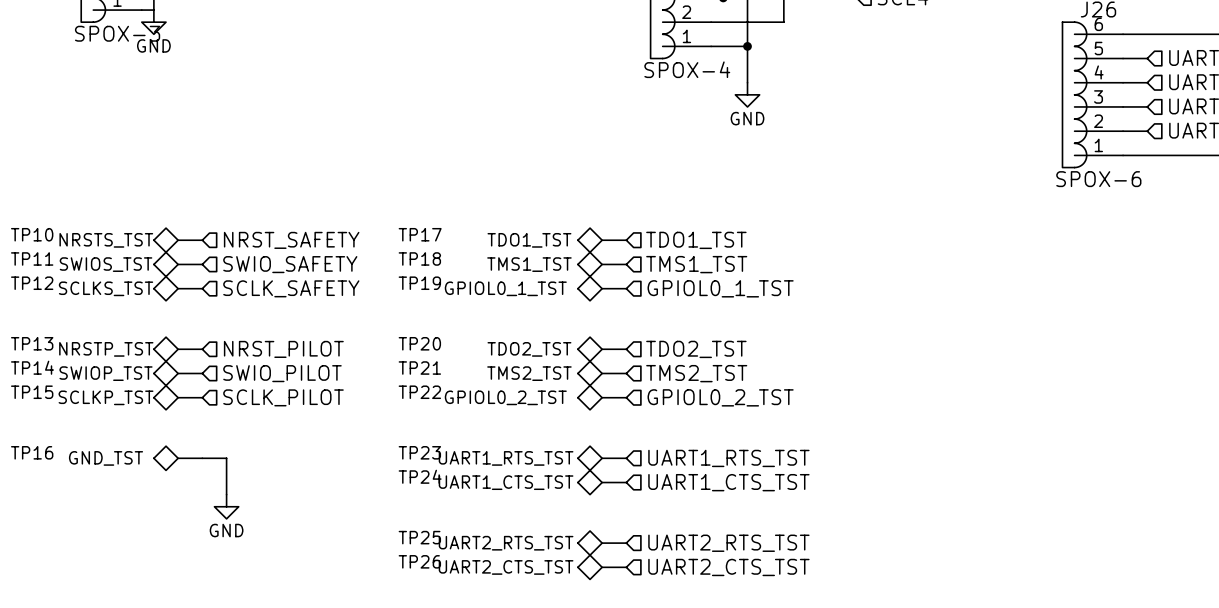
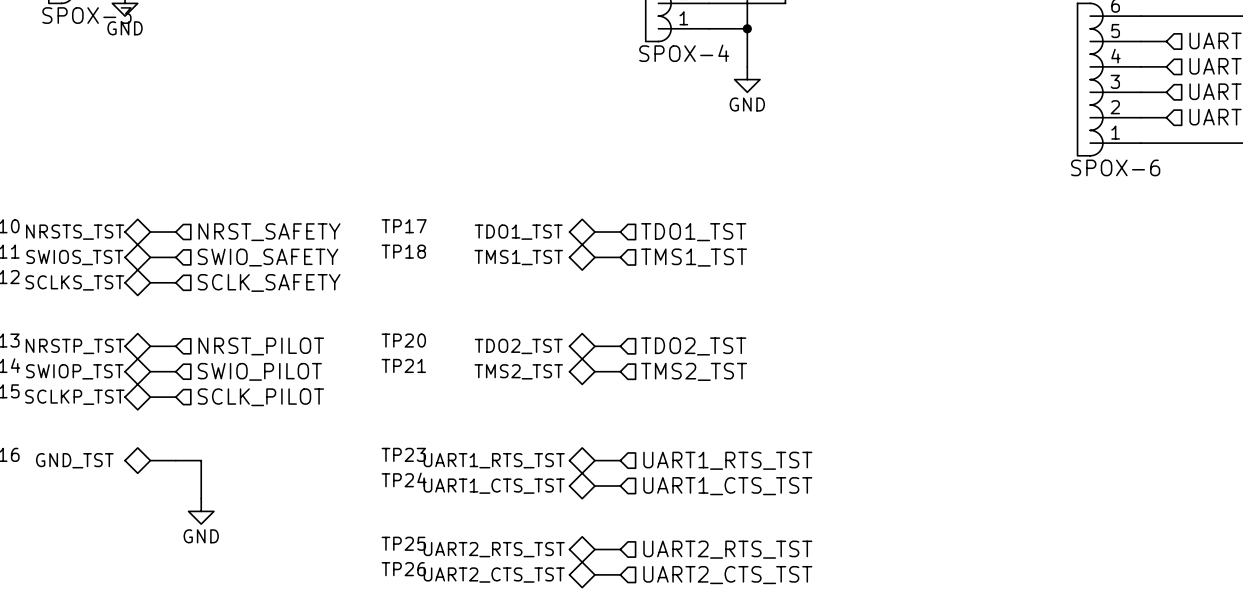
TP19: GPIOL0_1_TST (602, 288) -> none
hierarchical label: GPIOL0_1_TST (720, 288) -> none
TP22: GPIOL0_2_TST (602, 397) -> none
hierarchical label: GPIOL0_2_TST (720, 397) -> none

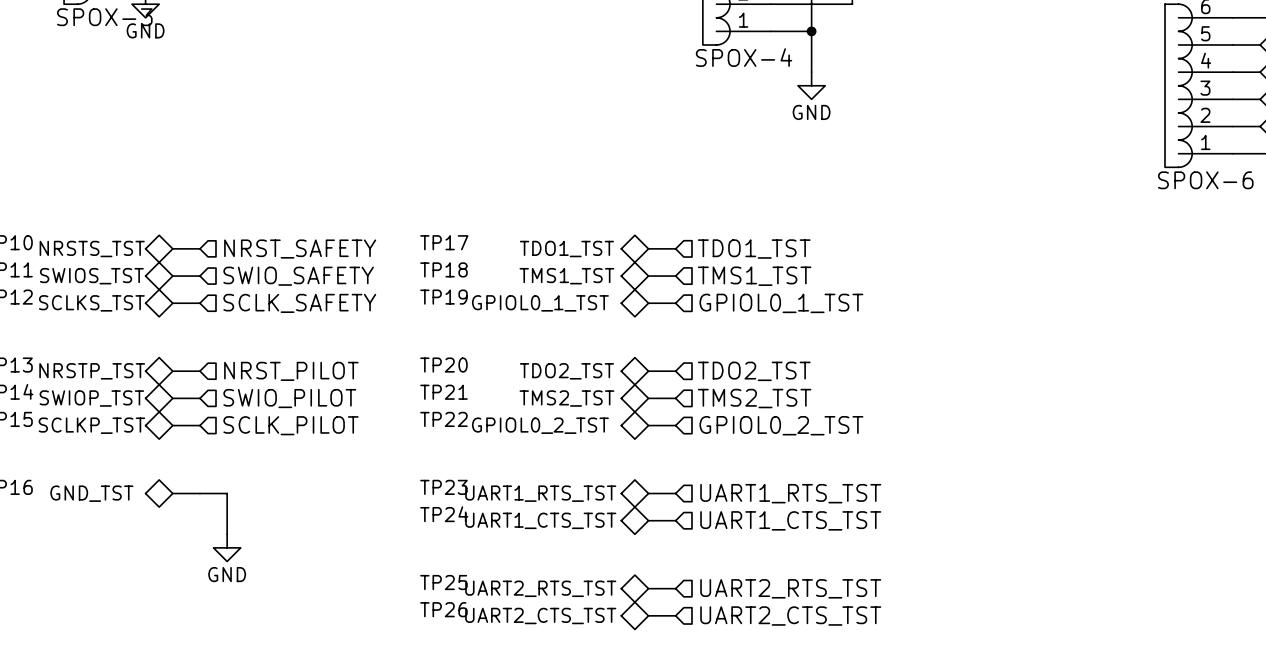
TP19: none -> GPIOL0_1_TST (648, 303)
hierarchical label: none -> GPIOL0_1_TST (781, 303)
TP22: none -> GPIOL0_2_TST (648, 425)
hierarchical label: none -> GPIOL0_2_TST (781, 425)

